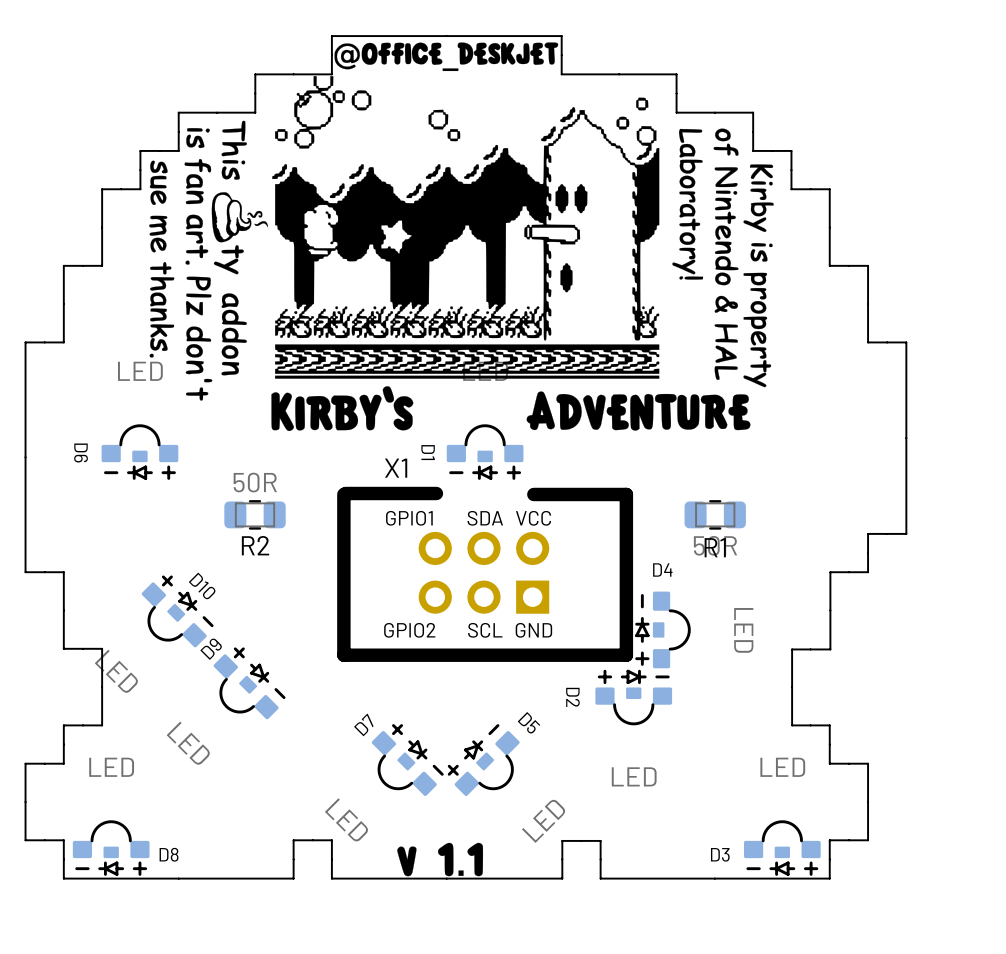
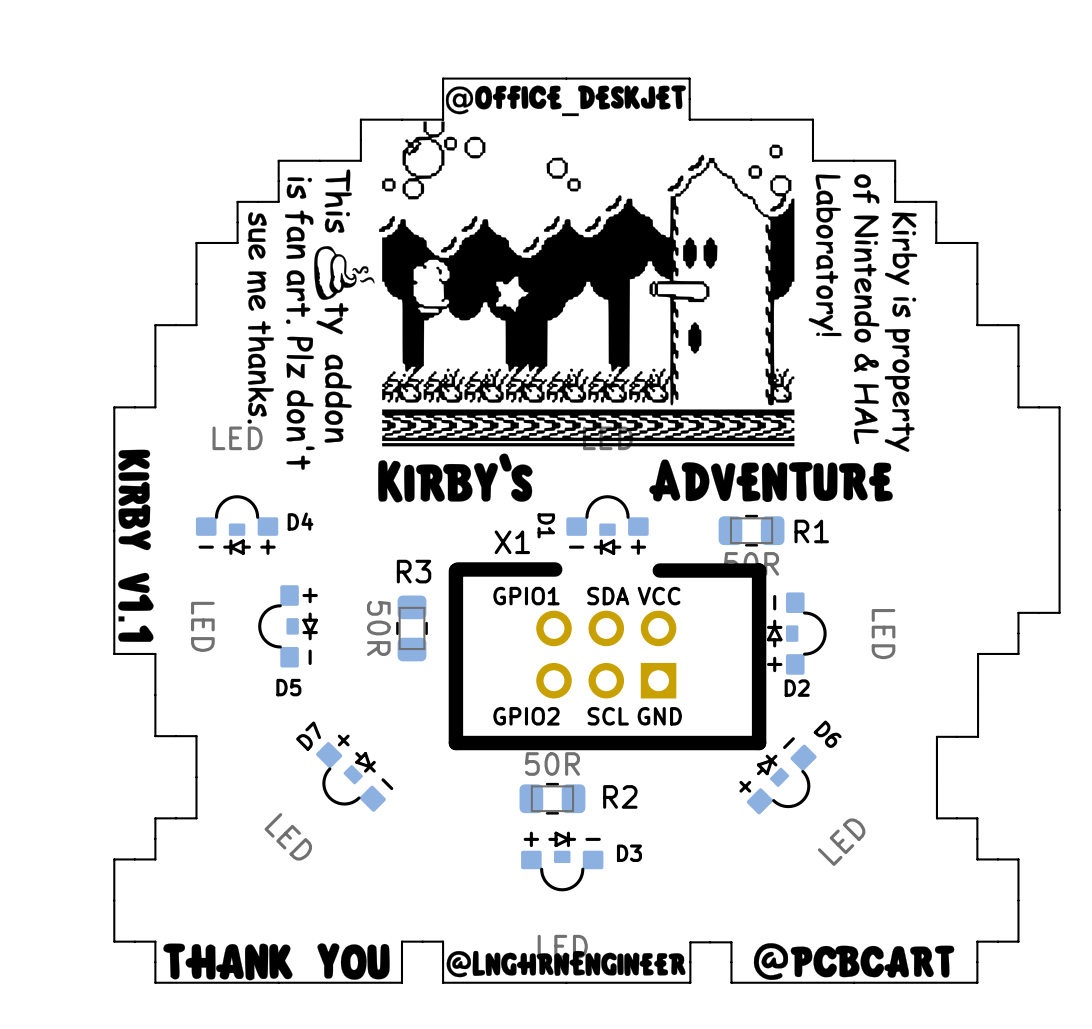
drawing: none -> [118, 85, 955, 981]
drawing: [149, 42, 774, 877] -> none
D6 name: D6 (81, 452) -> D4 (300, 521)
R2 position: (255, 514) -> (552, 798)
R1 position: (715, 514) -> (751, 530)
R2 name position: R2 (255, 545) -> R2 (620, 796)
R1 name position: R1 (715, 547) -> R1 (811, 531)
R3: none -> 50R (412, 628)
D10: LED (177, 611) -> none
D4: LED (662, 629) -> none
D9 name: D9 (211, 649) -> D7 (308, 736)
D6: none -> LED (778, 775)
D2 rotation: 0° (633, 697) -> 90° counterclockwise (796, 633)
D2 position: (633, 697) -> (796, 633)
D7: LED (407, 760) -> none
D5 rotation: 0° (483, 760) -> 135° clockwise (288, 626)
D5 position: (483, 760) -> (288, 626)
D8: LED (111, 848) -> none
D3 rotation: 0° (782, 848) -> 180° (562, 861)
D3 position: (782, 848) -> (562, 861)

